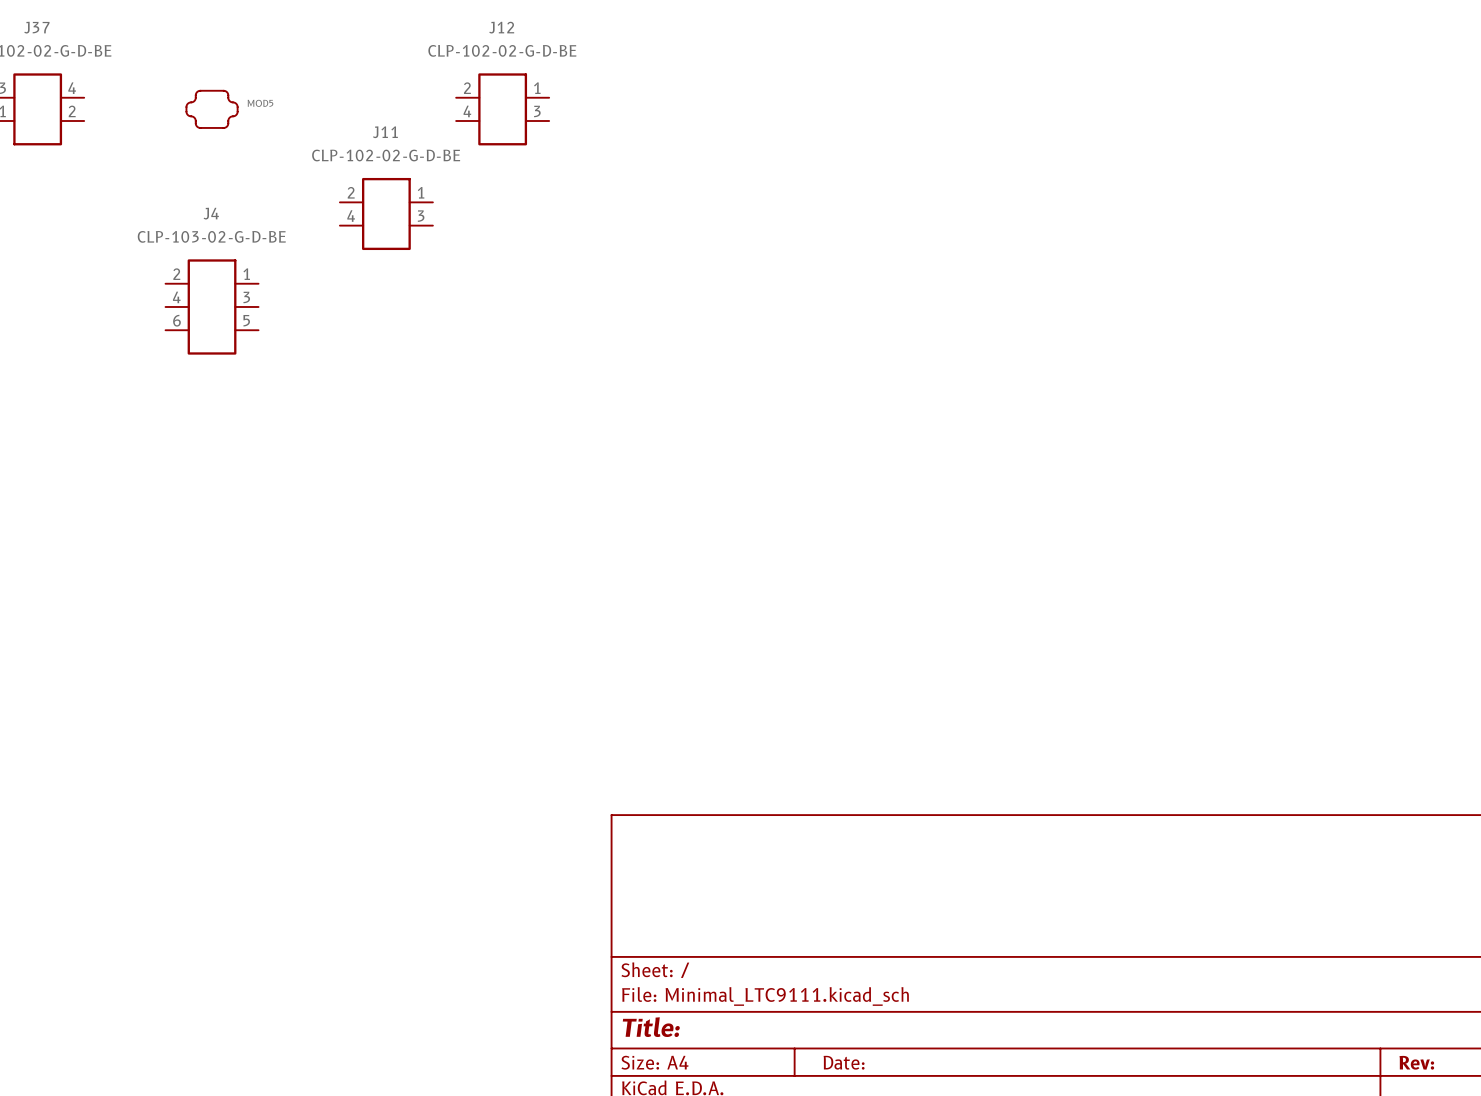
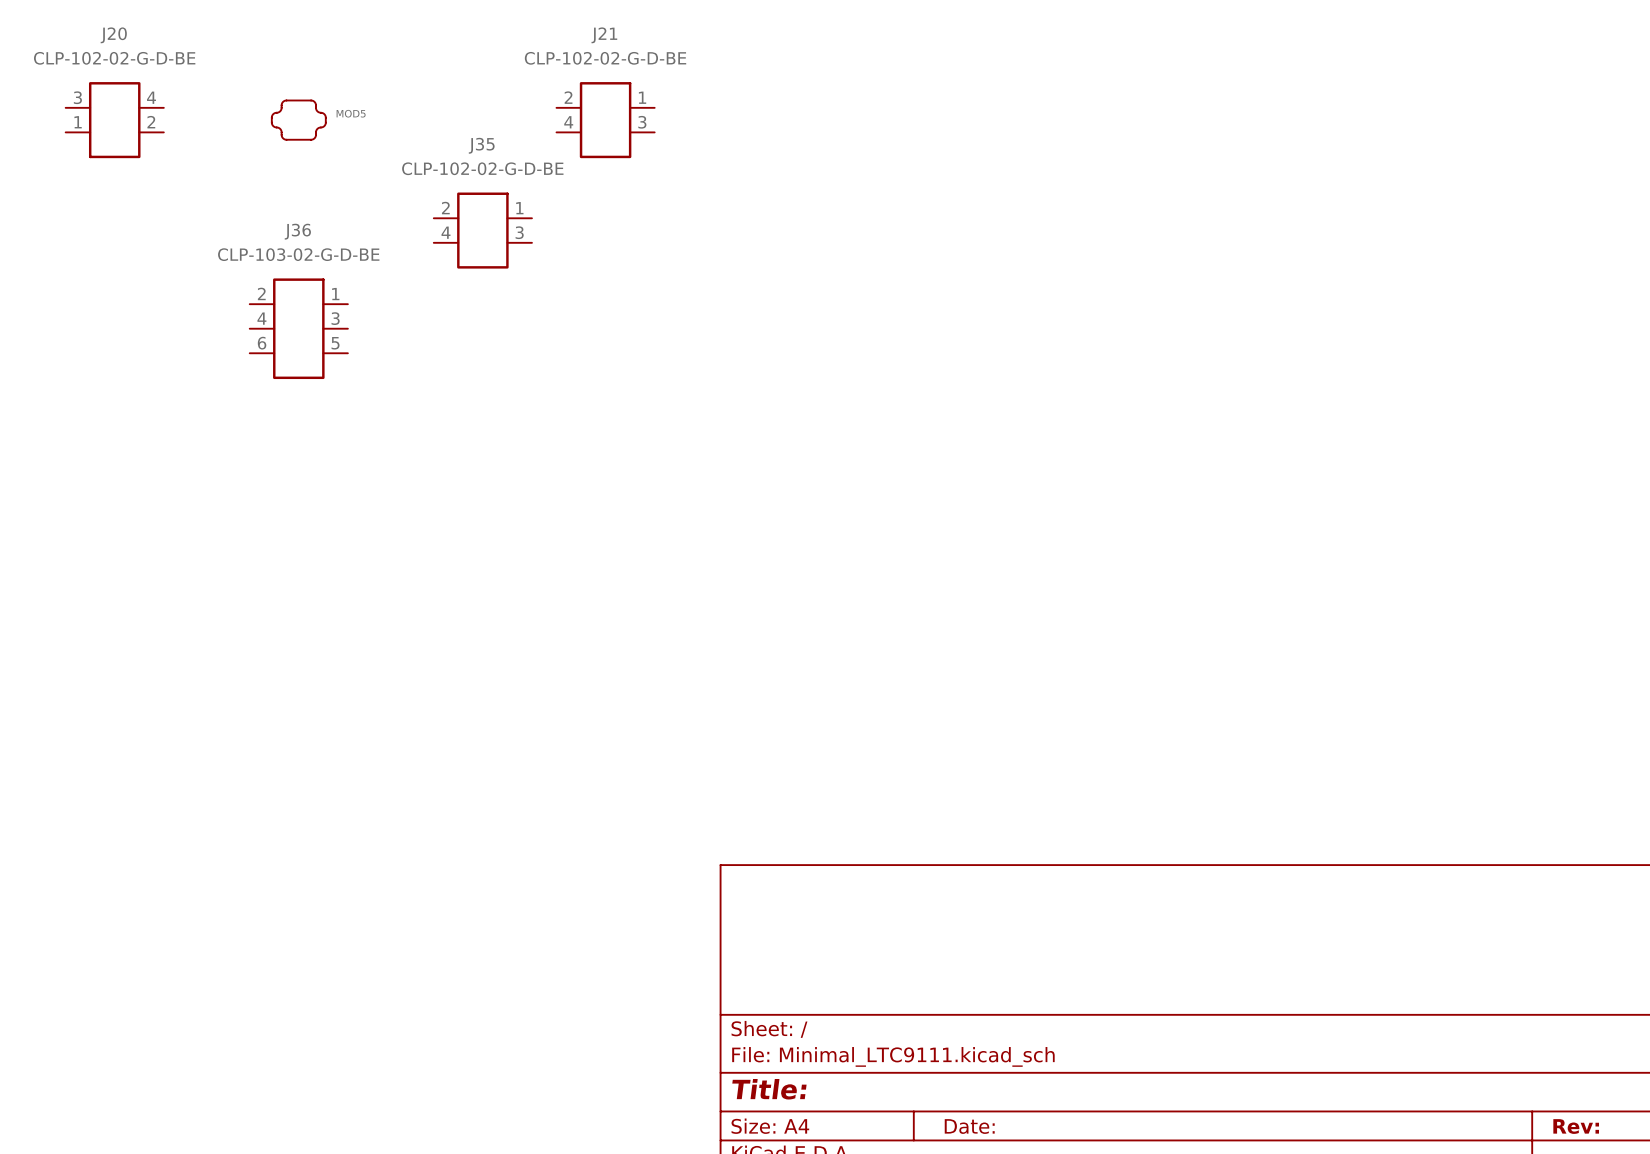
J37 name: J37 (36, 27) -> J20 (113, 35)
J12 name: J12 (501, 27) -> J21 (604, 35)
J11 name: J11 (385, 132) -> J35 (481, 145)
J4 name: J4 (211, 213) -> J36 (297, 231)

